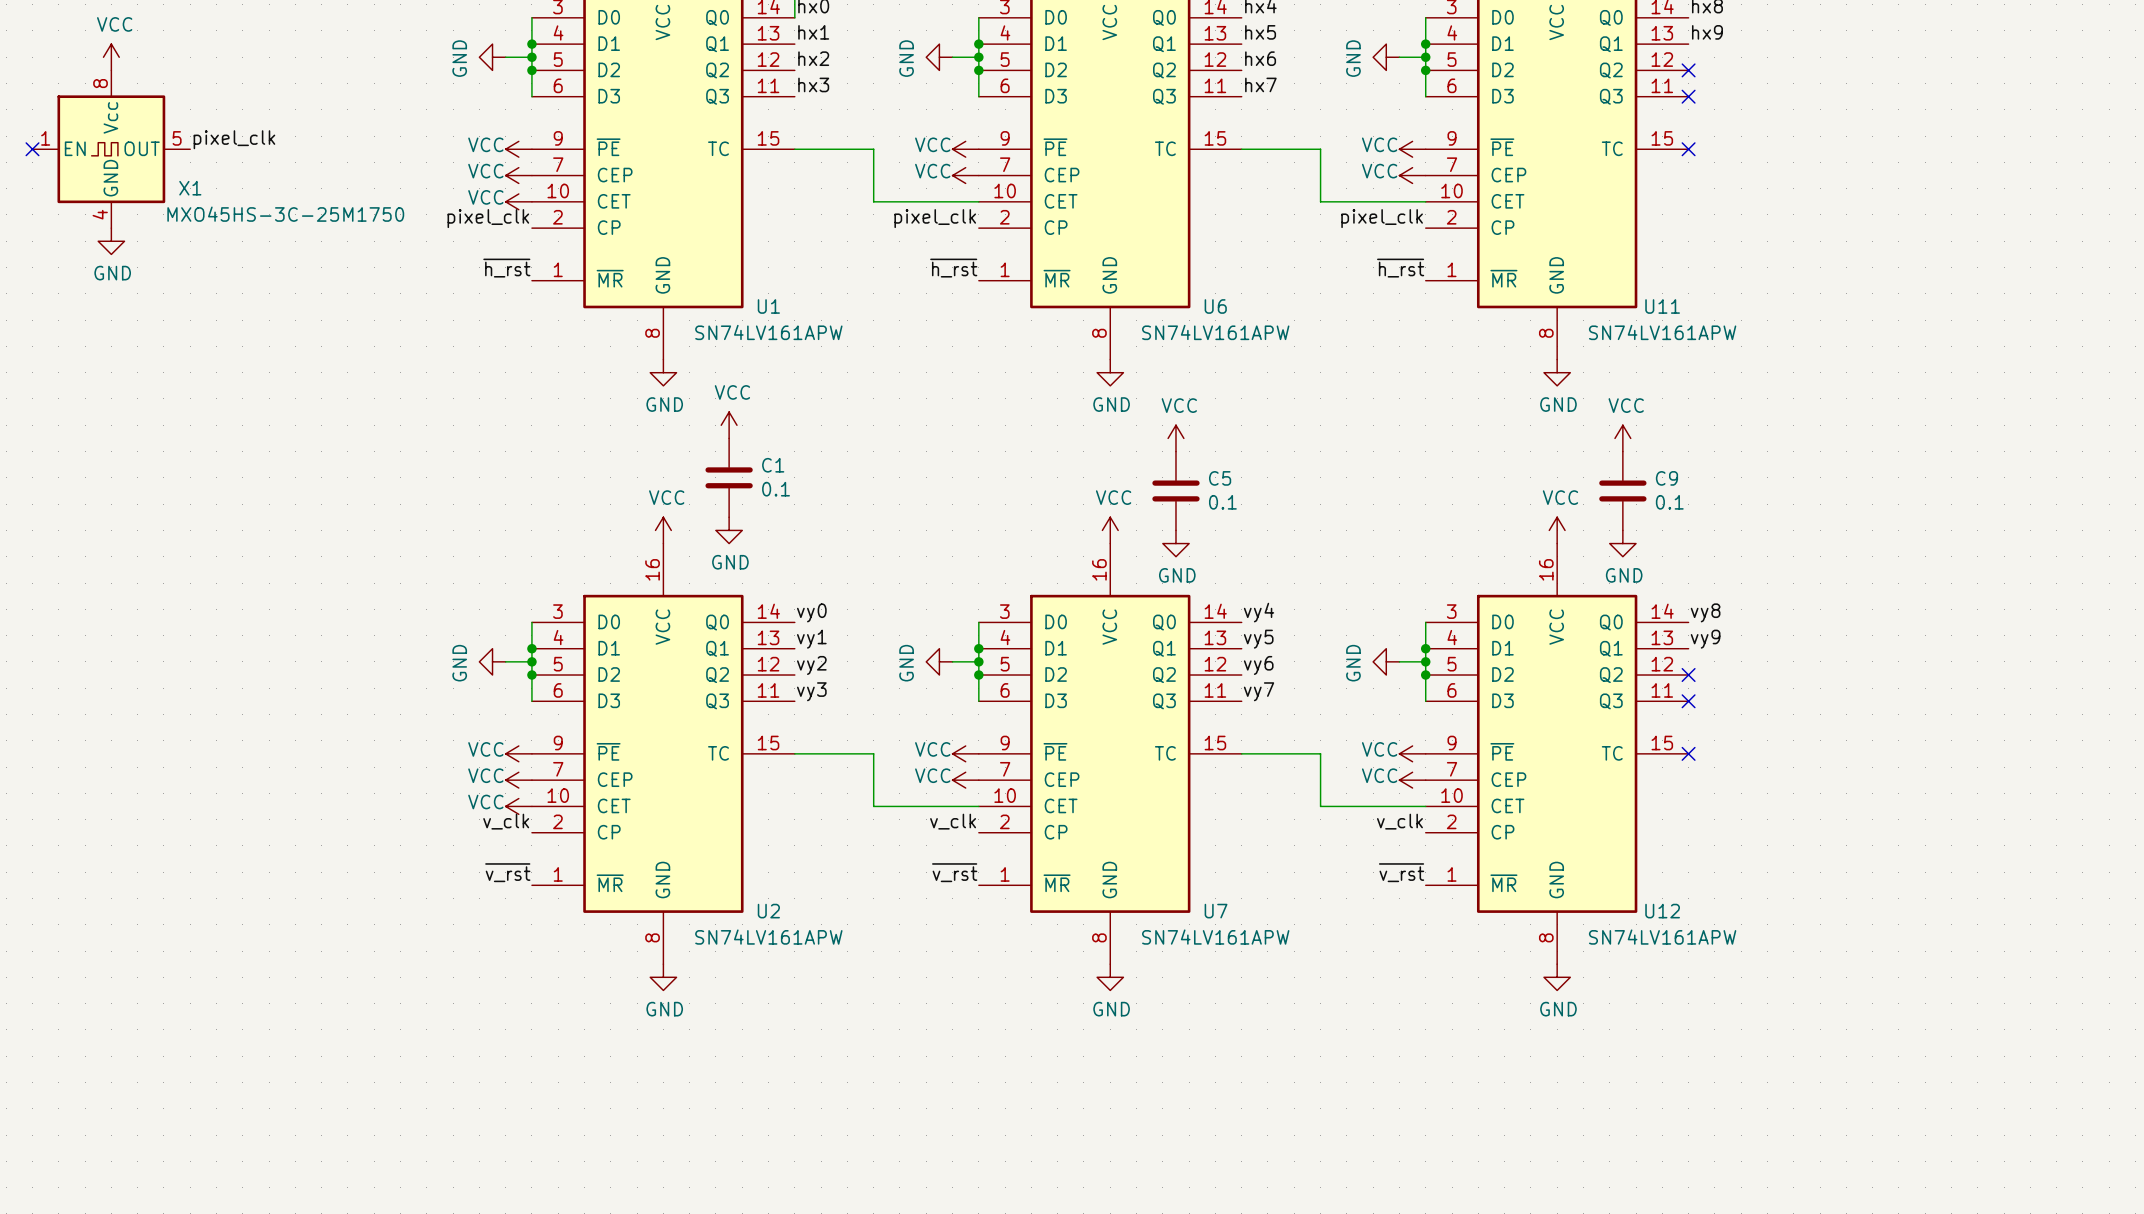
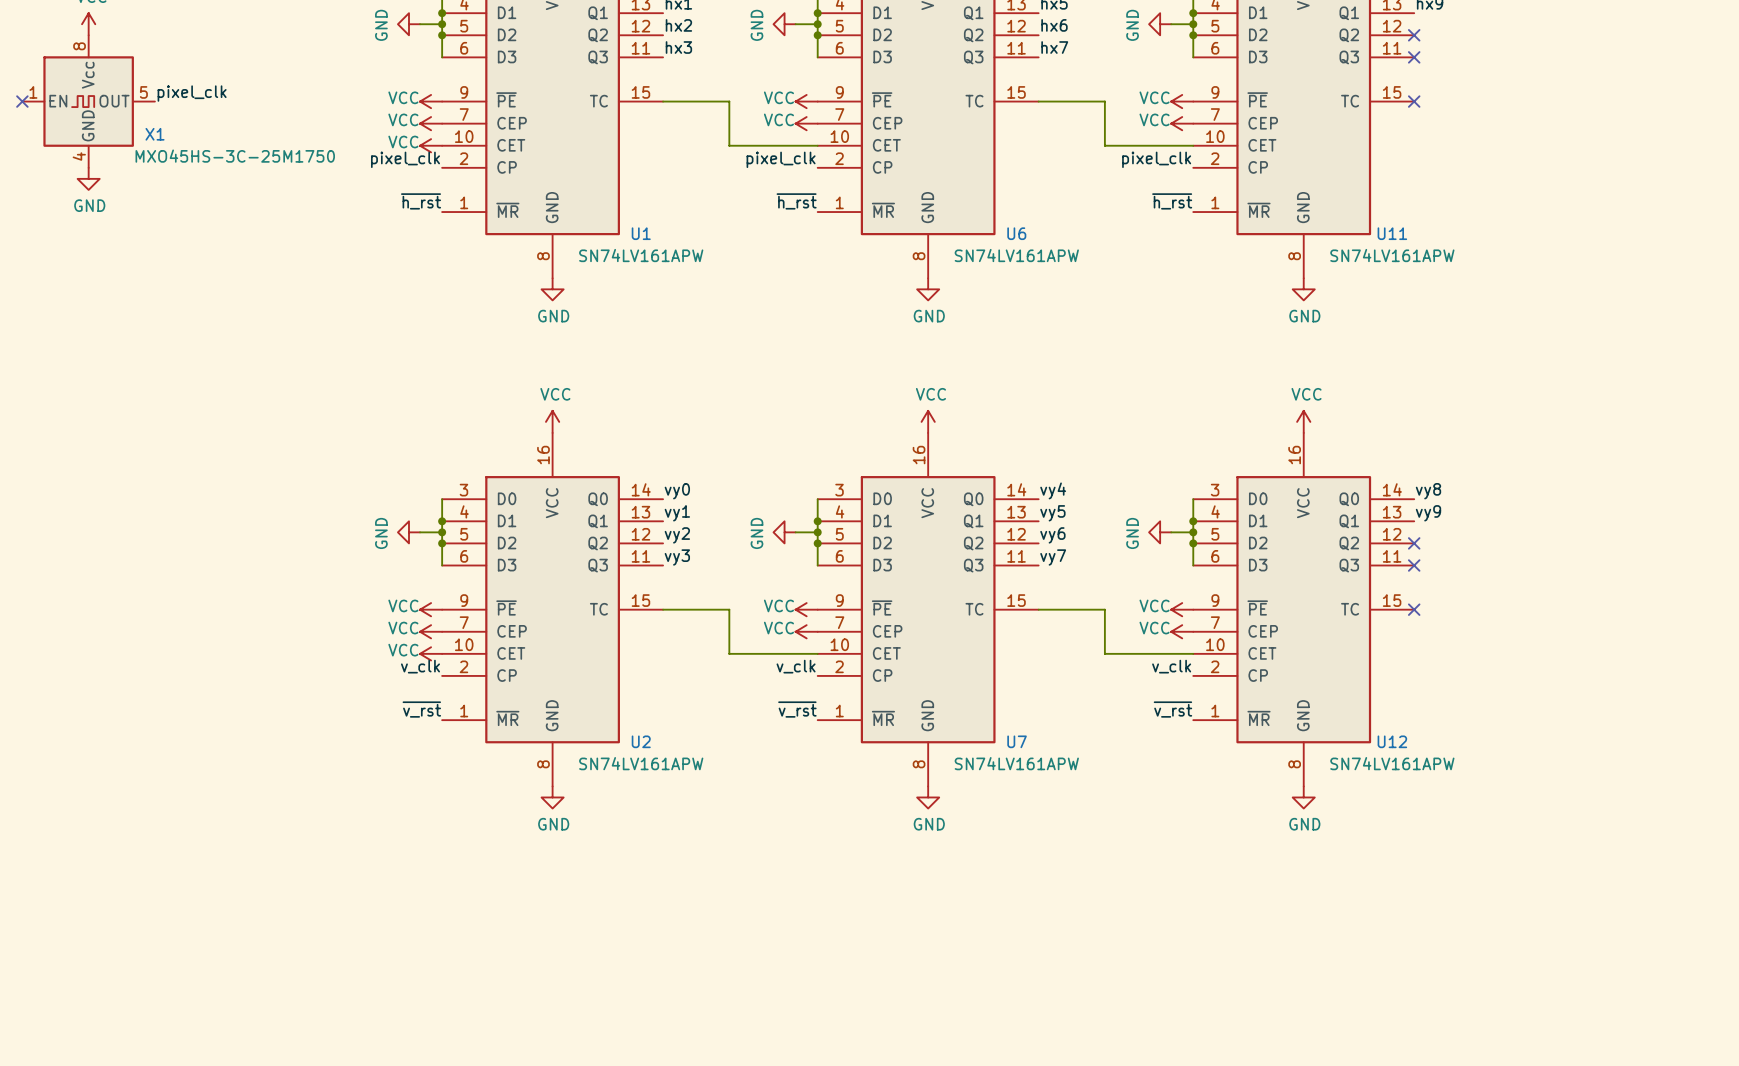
power symbol: VCC (729, 425) -> none
power symbol: VCC (1175, 438) -> none
power symbol: VCC (1622, 438) -> none
C1: 0.1 (729, 477) -> none
C5: 0.1 (1175, 490) -> none
C9: 0.1 (1622, 490) -> none
power symbol: GND (729, 530) -> none
power symbol: GND (1175, 543) -> none
power symbol: GND (1622, 543) -> none

